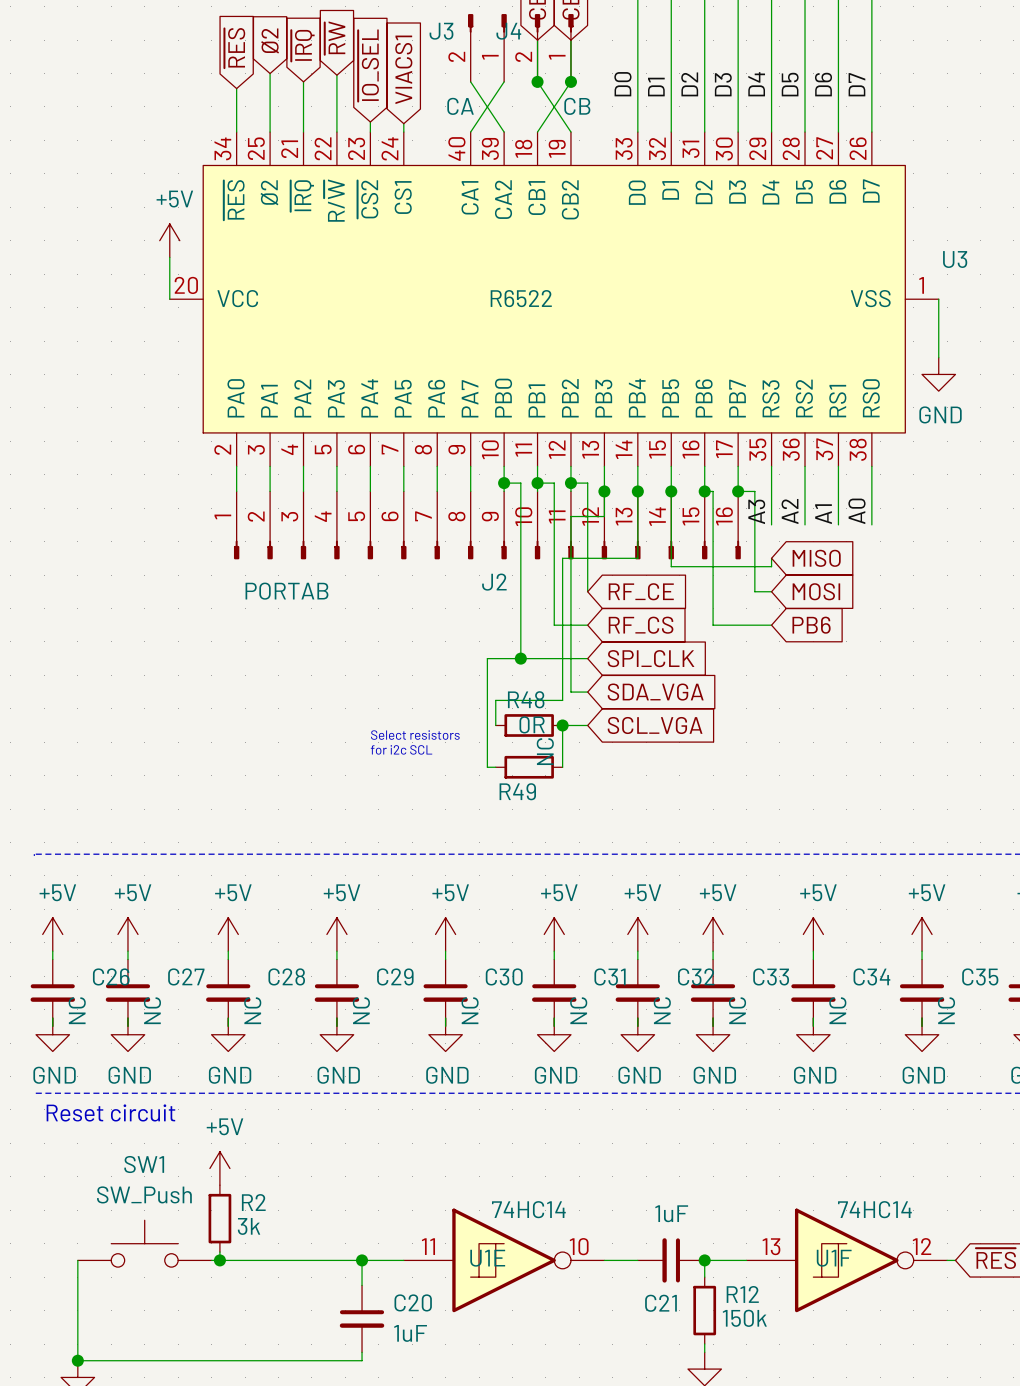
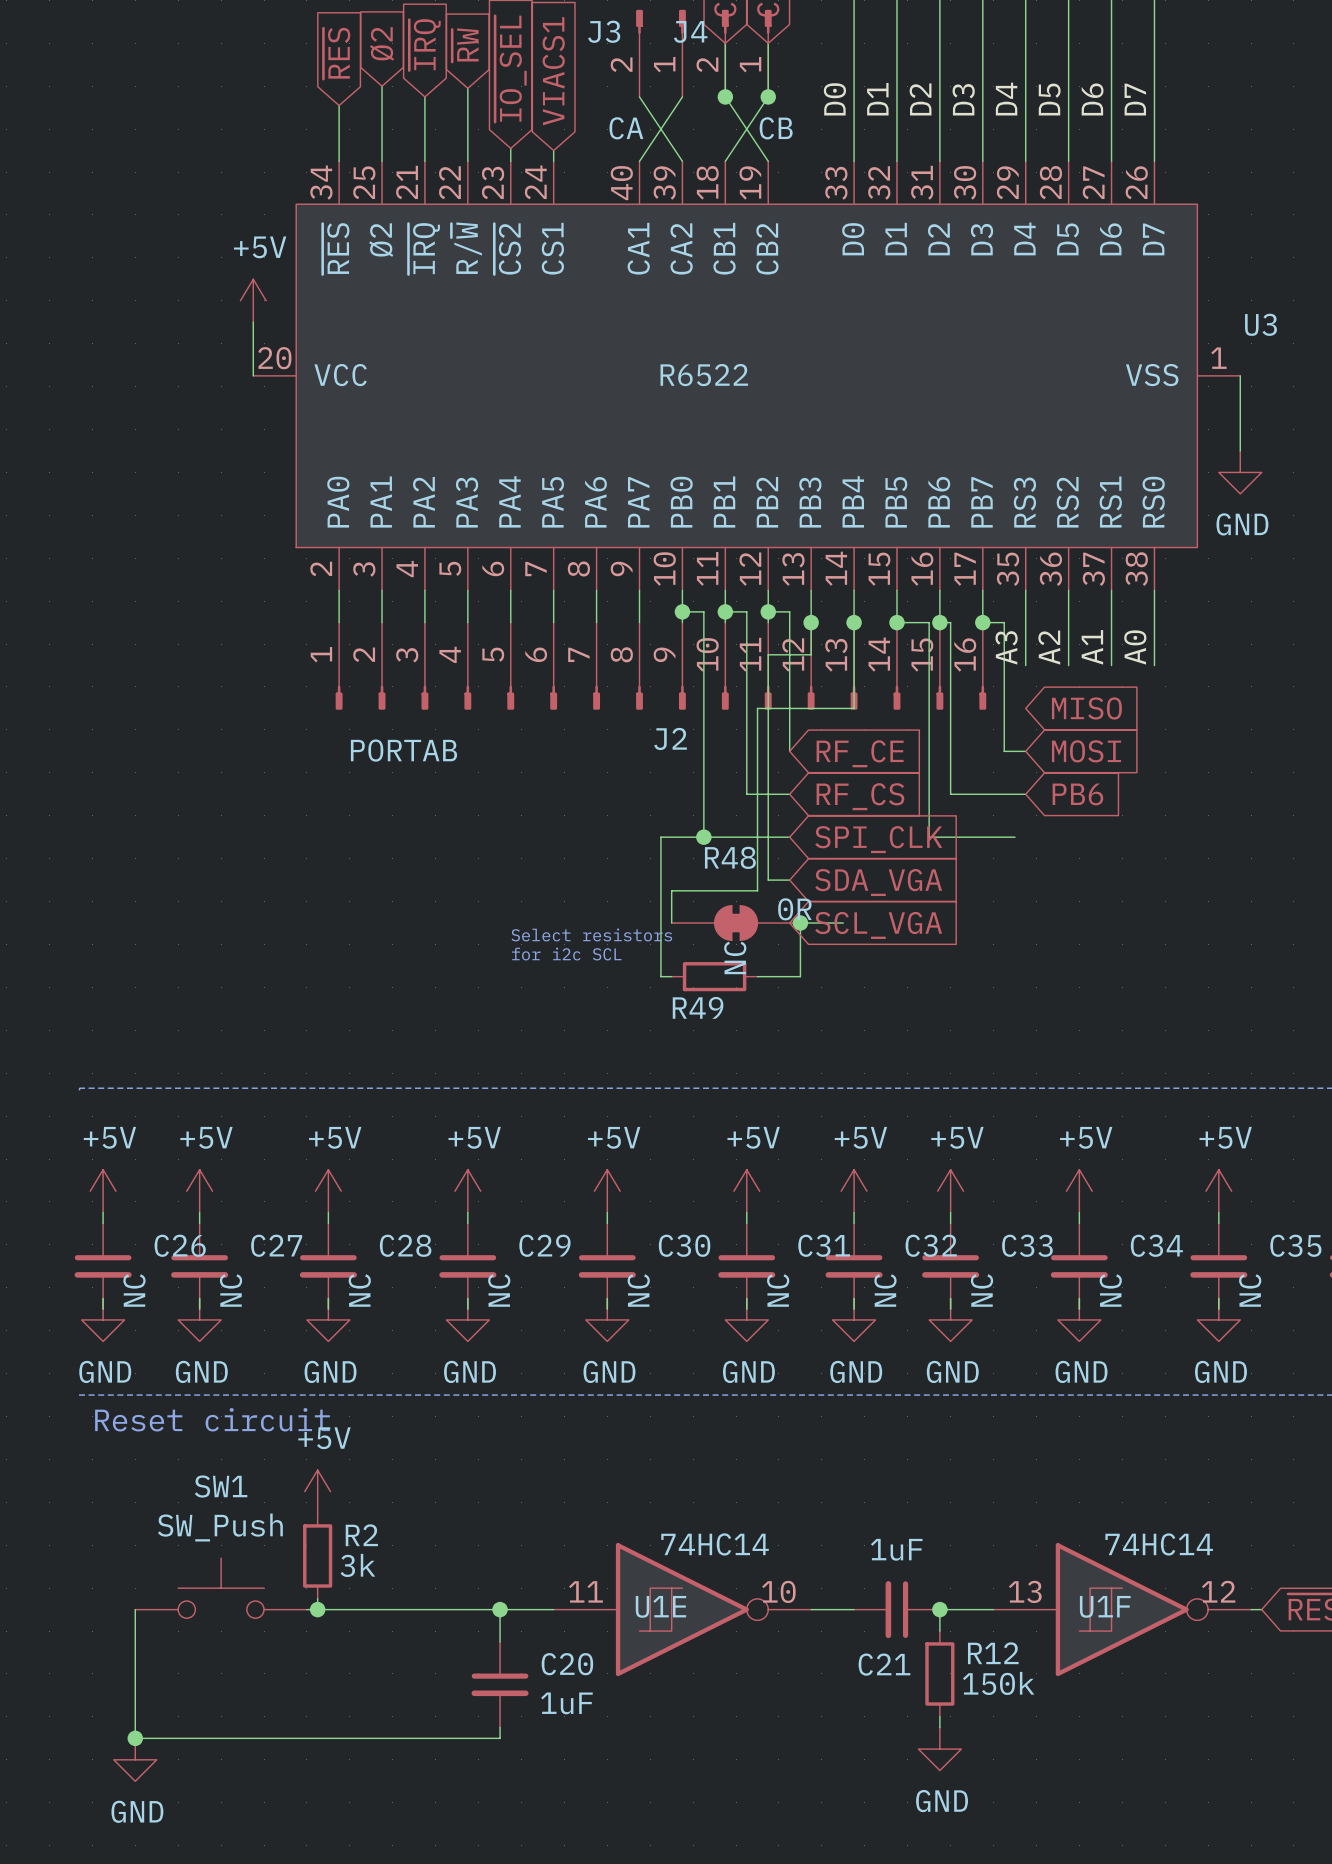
wire: (671, 491) (671, 566) (771, 566) (771, 558) -> (896, 622) (929, 622) (929, 837) (1014, 837)
R48 symbol: [495, 714, 563, 737] -> [671, 905, 801, 941]
R48 value position: 0R (532, 724) -> 0R (794, 909)
junction position: (562, 725) -> (800, 923)
wire: (587, 725) (562, 725) (562, 767) -> (843, 923) (800, 923) (800, 976) (757, 976)

